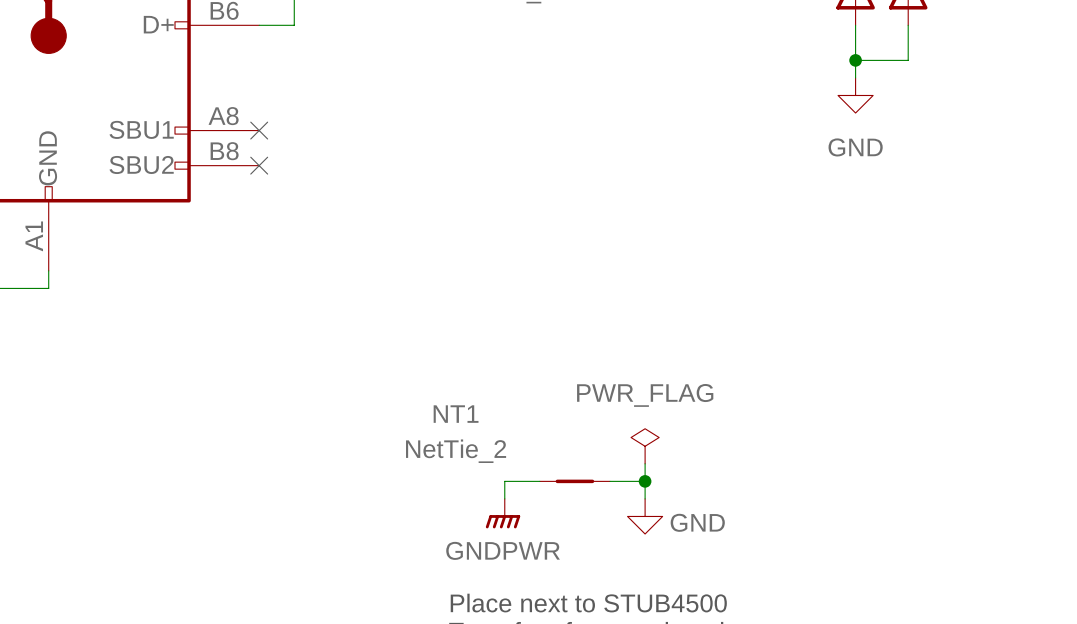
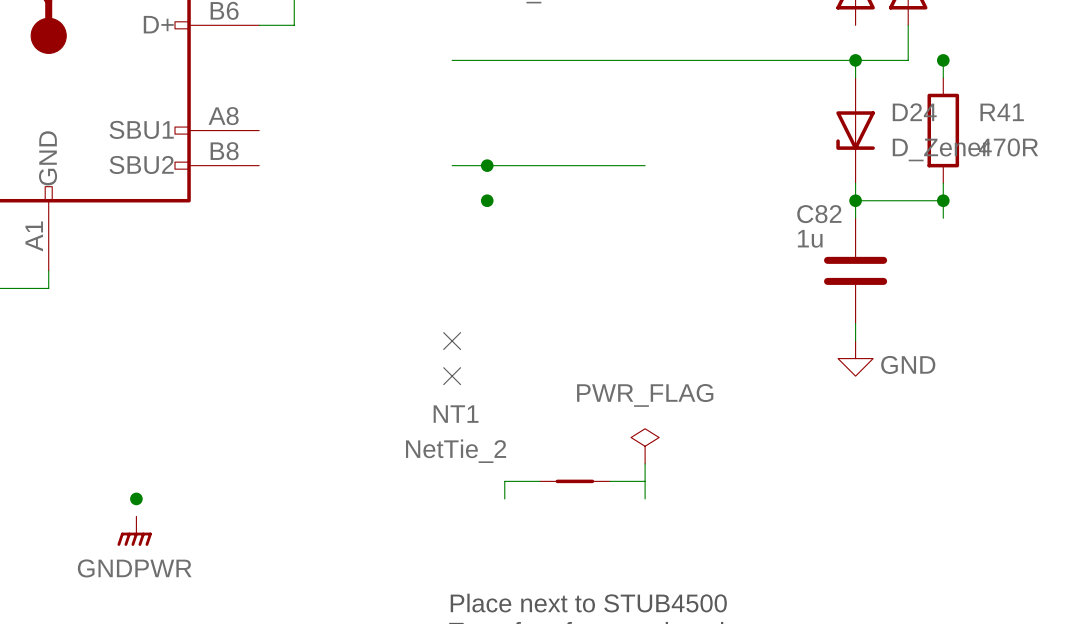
wire: (855, 25) (855, 60) -> (452, 60) (855, 60)
wire: none -> (943, 60) (943, 77)
junction: none -> (943, 60)
power symbol: GND (855, 95) -> none
no-connect mark: (259, 130) -> none
D24: none -> D_Zener (855, 130)
R41: none -> 470R (943, 130)
no-connect mark: (259, 165) -> none
wire: none -> (452, 165) (645, 165)
junction: none -> (487, 165)
wire: none -> (855, 183) (855, 218)
wire: none -> (943, 183) (943, 218)
junction: none -> (487, 200)
wire: none -> (855, 200) (943, 200)
junction: none -> (855, 200)
junction: none -> (943, 200)
C82: none -> 1u (855, 270)
wire: none -> (855, 323) (855, 341)
no-connect mark: none -> (452, 341)
power symbol: none -> GND (855, 358)
no-connect mark: none -> (452, 376)
junction: (645, 481) -> none
junction: none -> (136, 498)
power symbol: GNDPWR (503, 513) -> none
power symbol: GND (645, 516) -> none
power symbol: none -> GNDPWR (134, 531)

